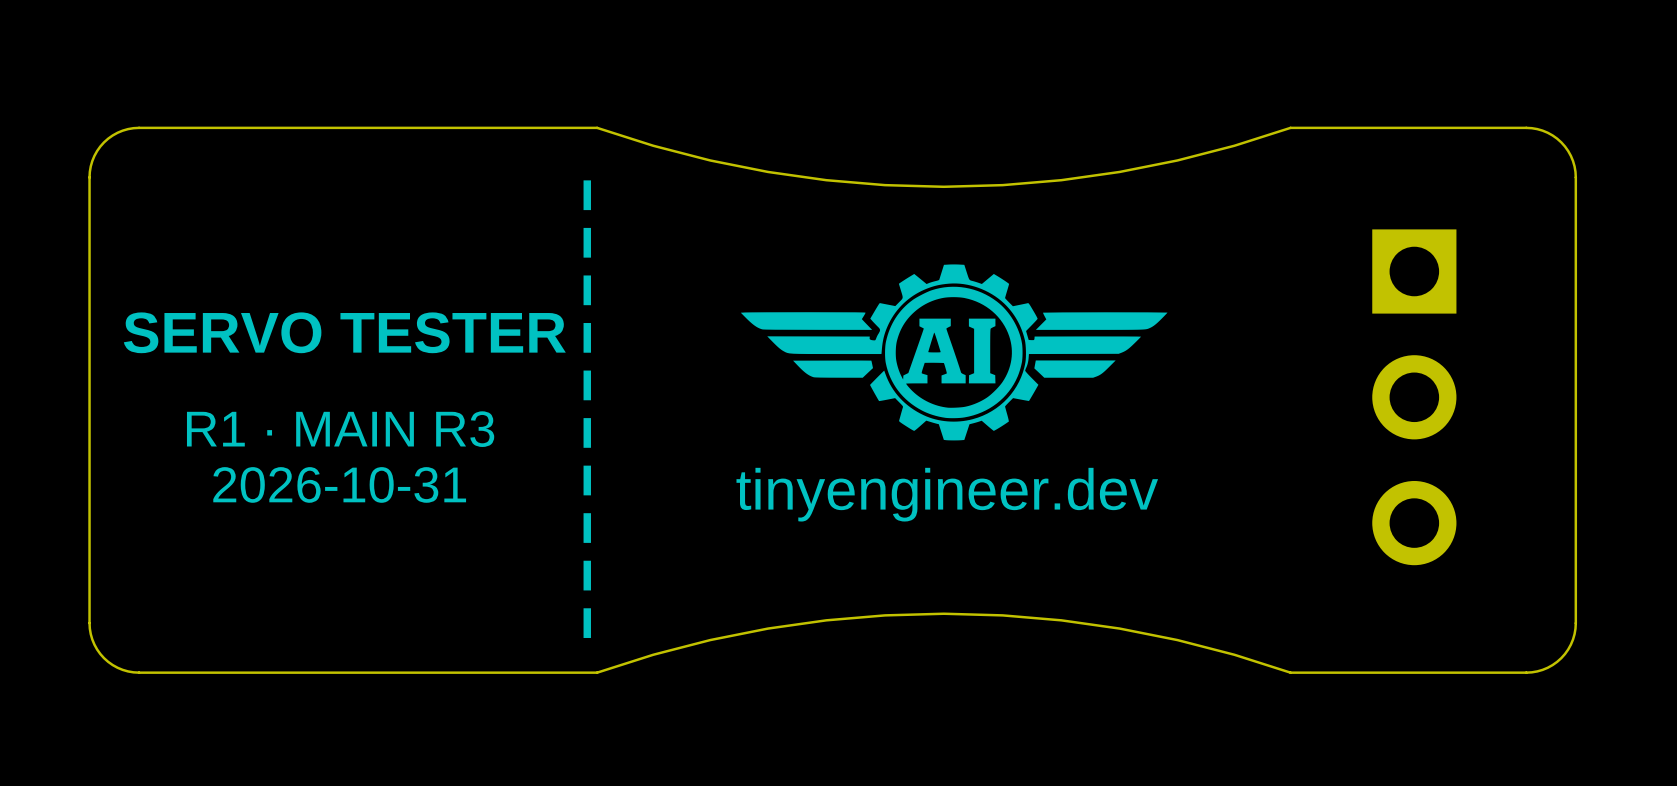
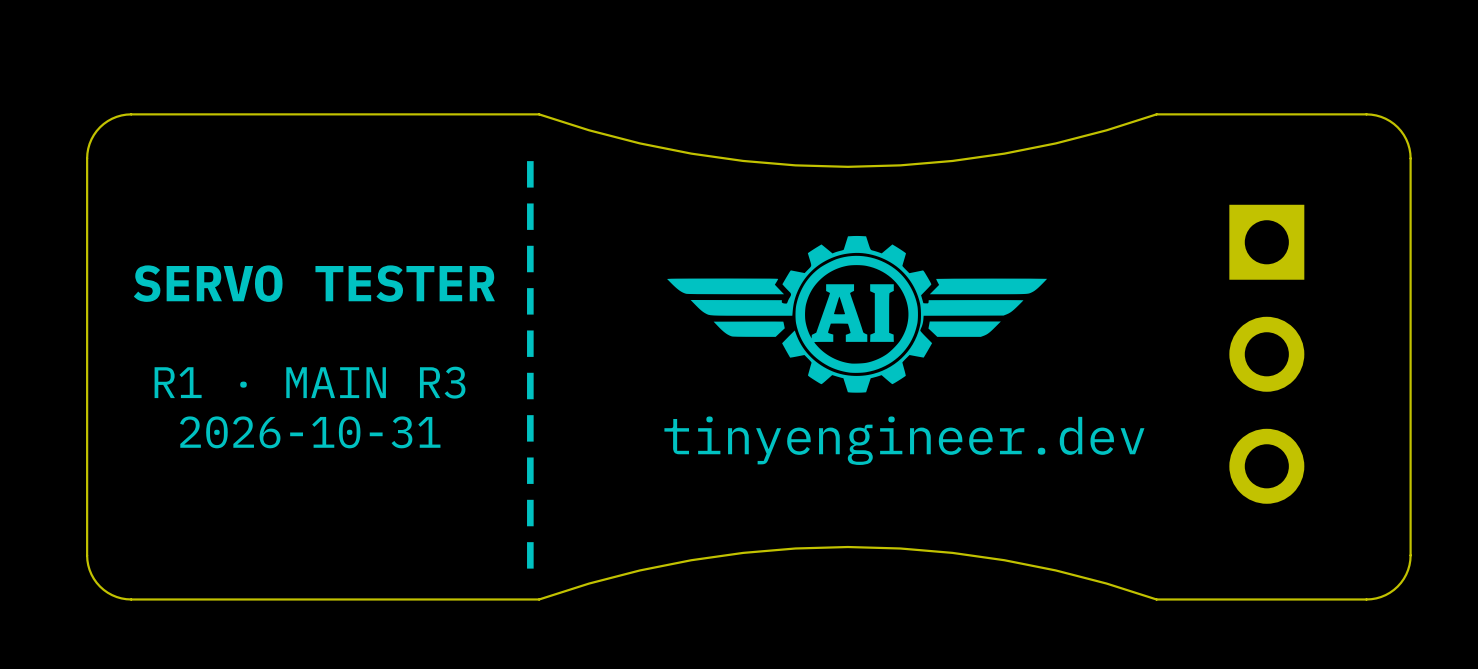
text position: SERVO TESTER (344, 332) -> SERVO TESTER (314, 283)

